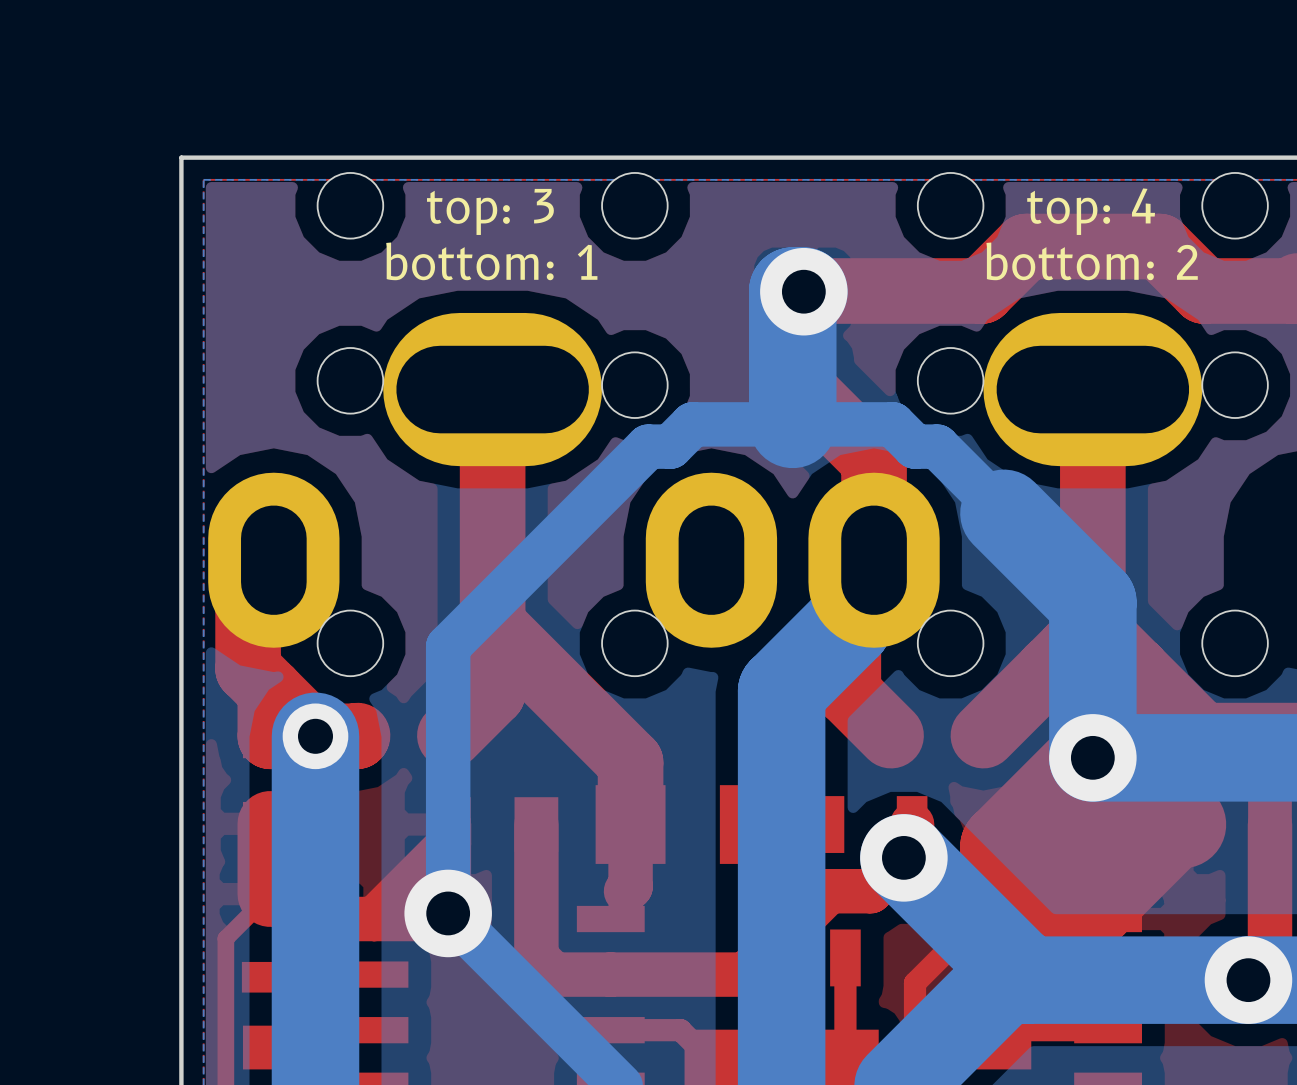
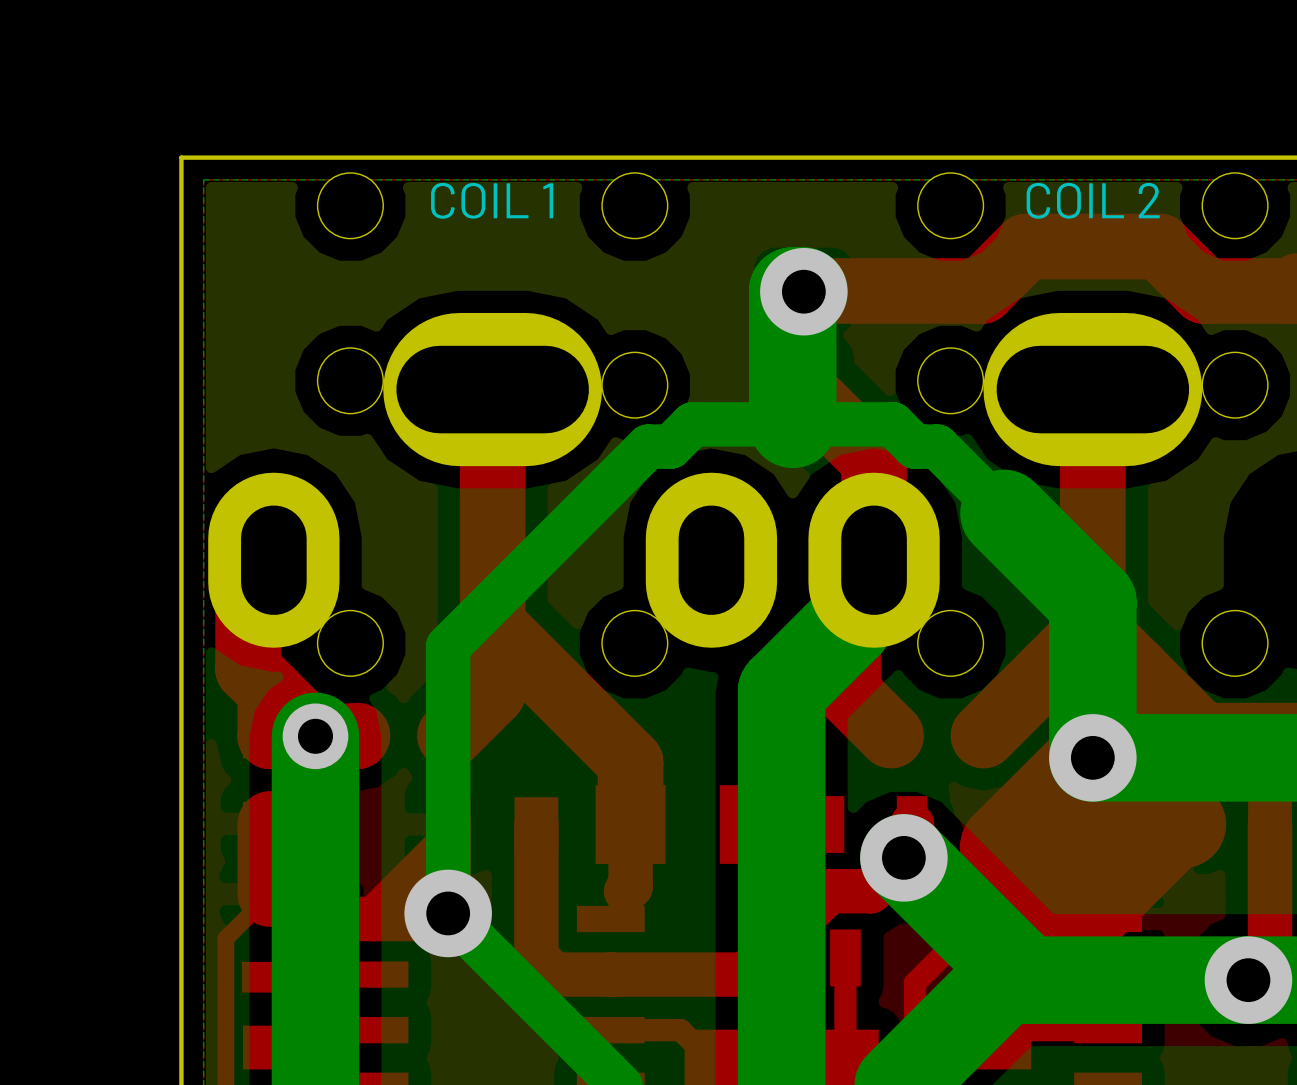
text: top: 3 (490, 211) -> COIL 1 (492, 200)
text: top: 4 (1091, 211) -> COIL 2 (1093, 200)
text: bottom: 1 (491, 261) -> none
text: bottom: 2 (1092, 261) -> none

